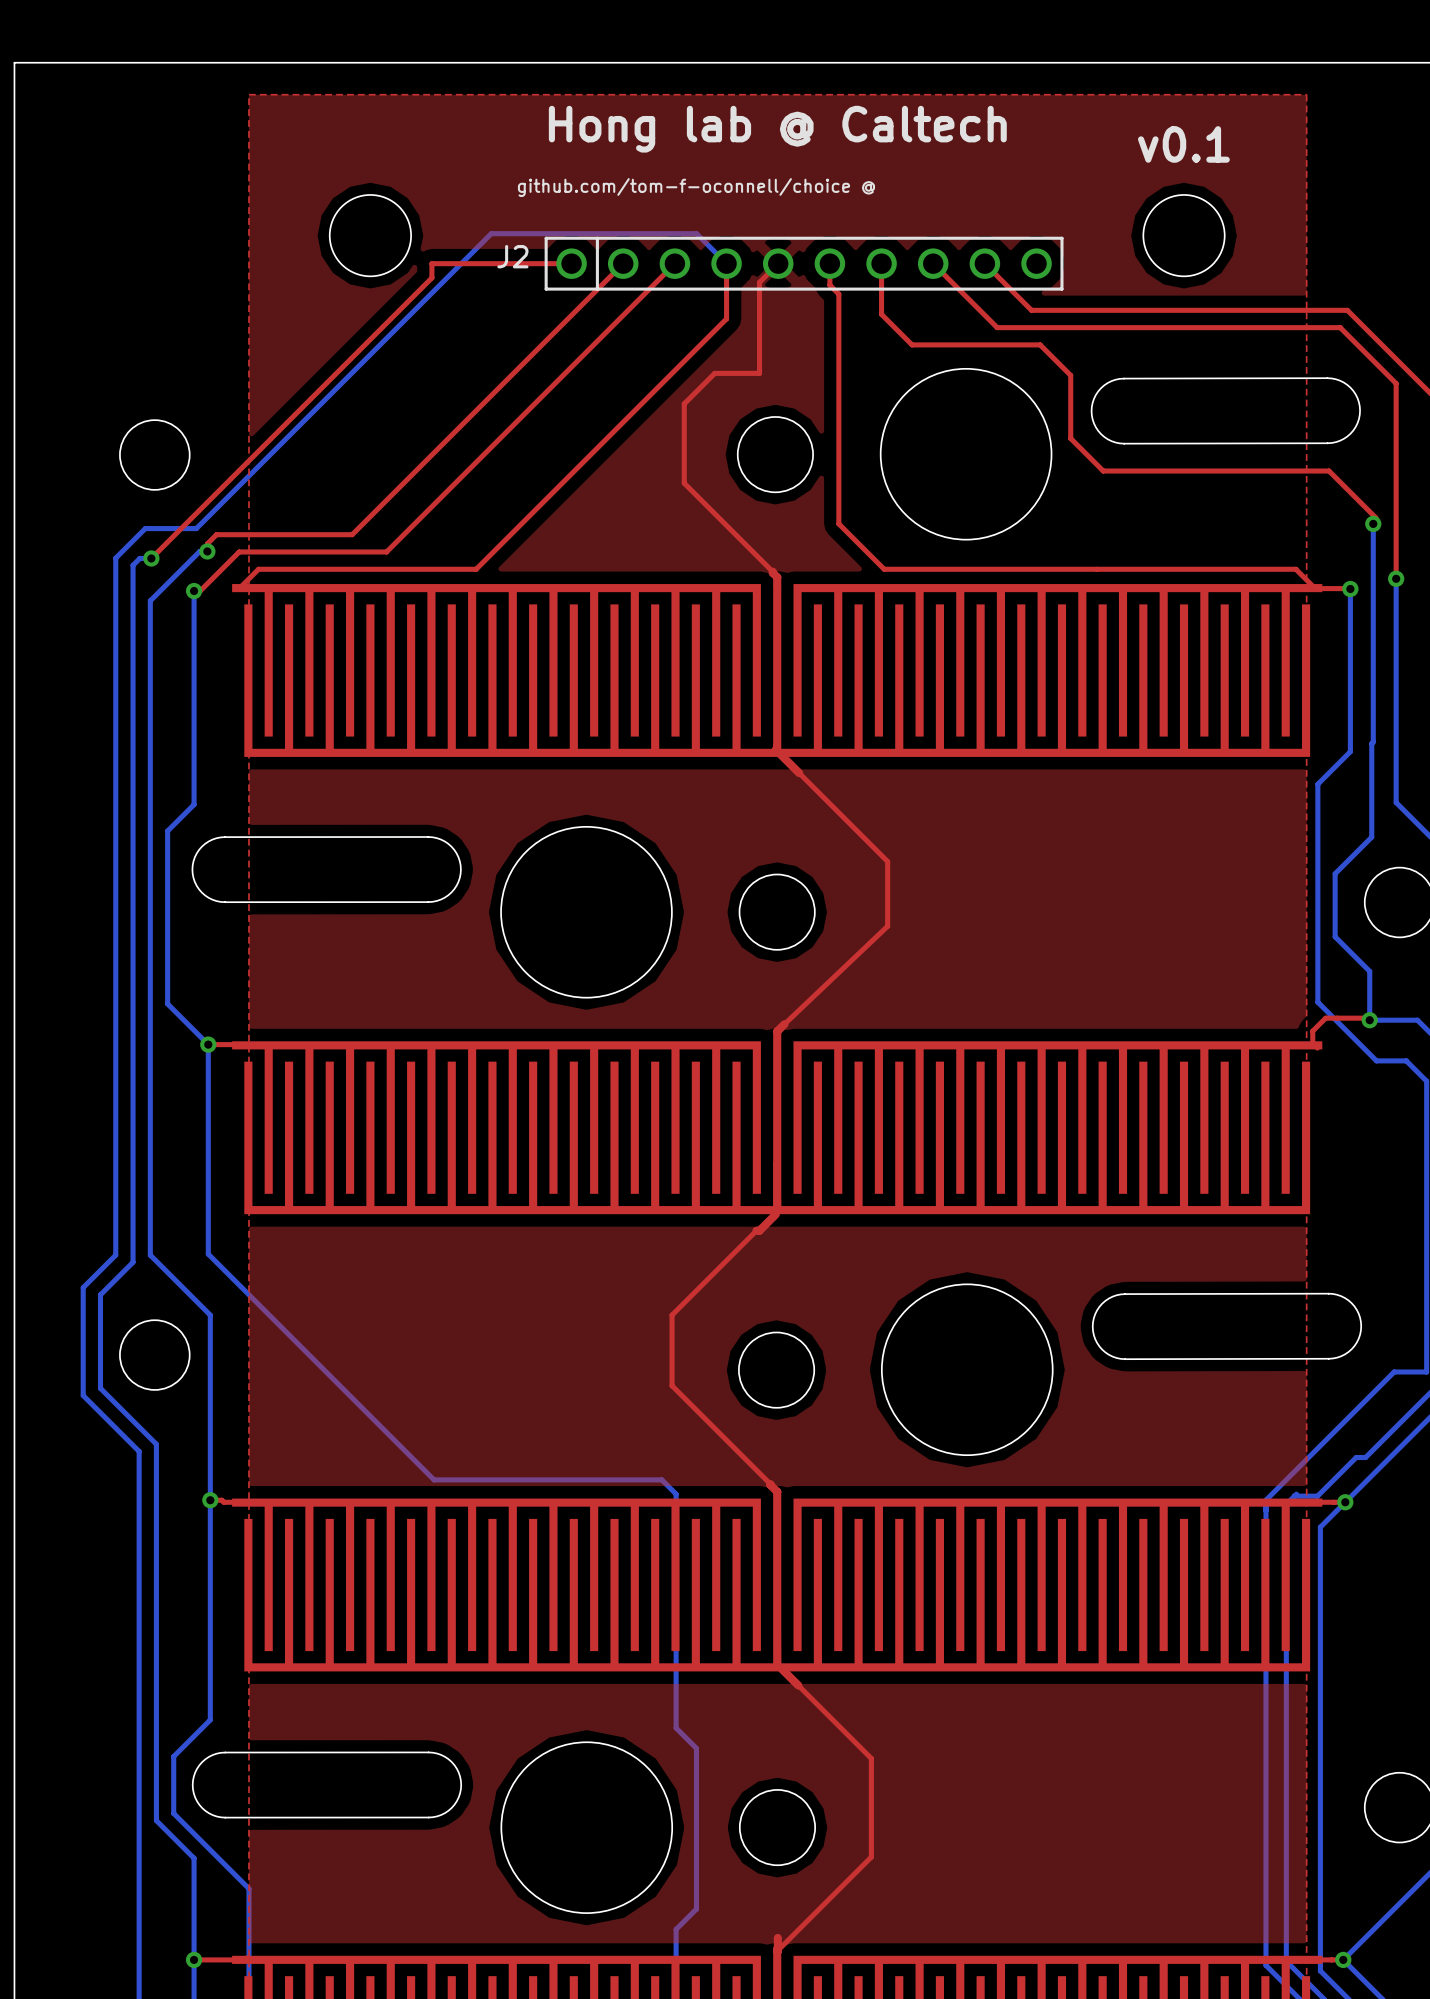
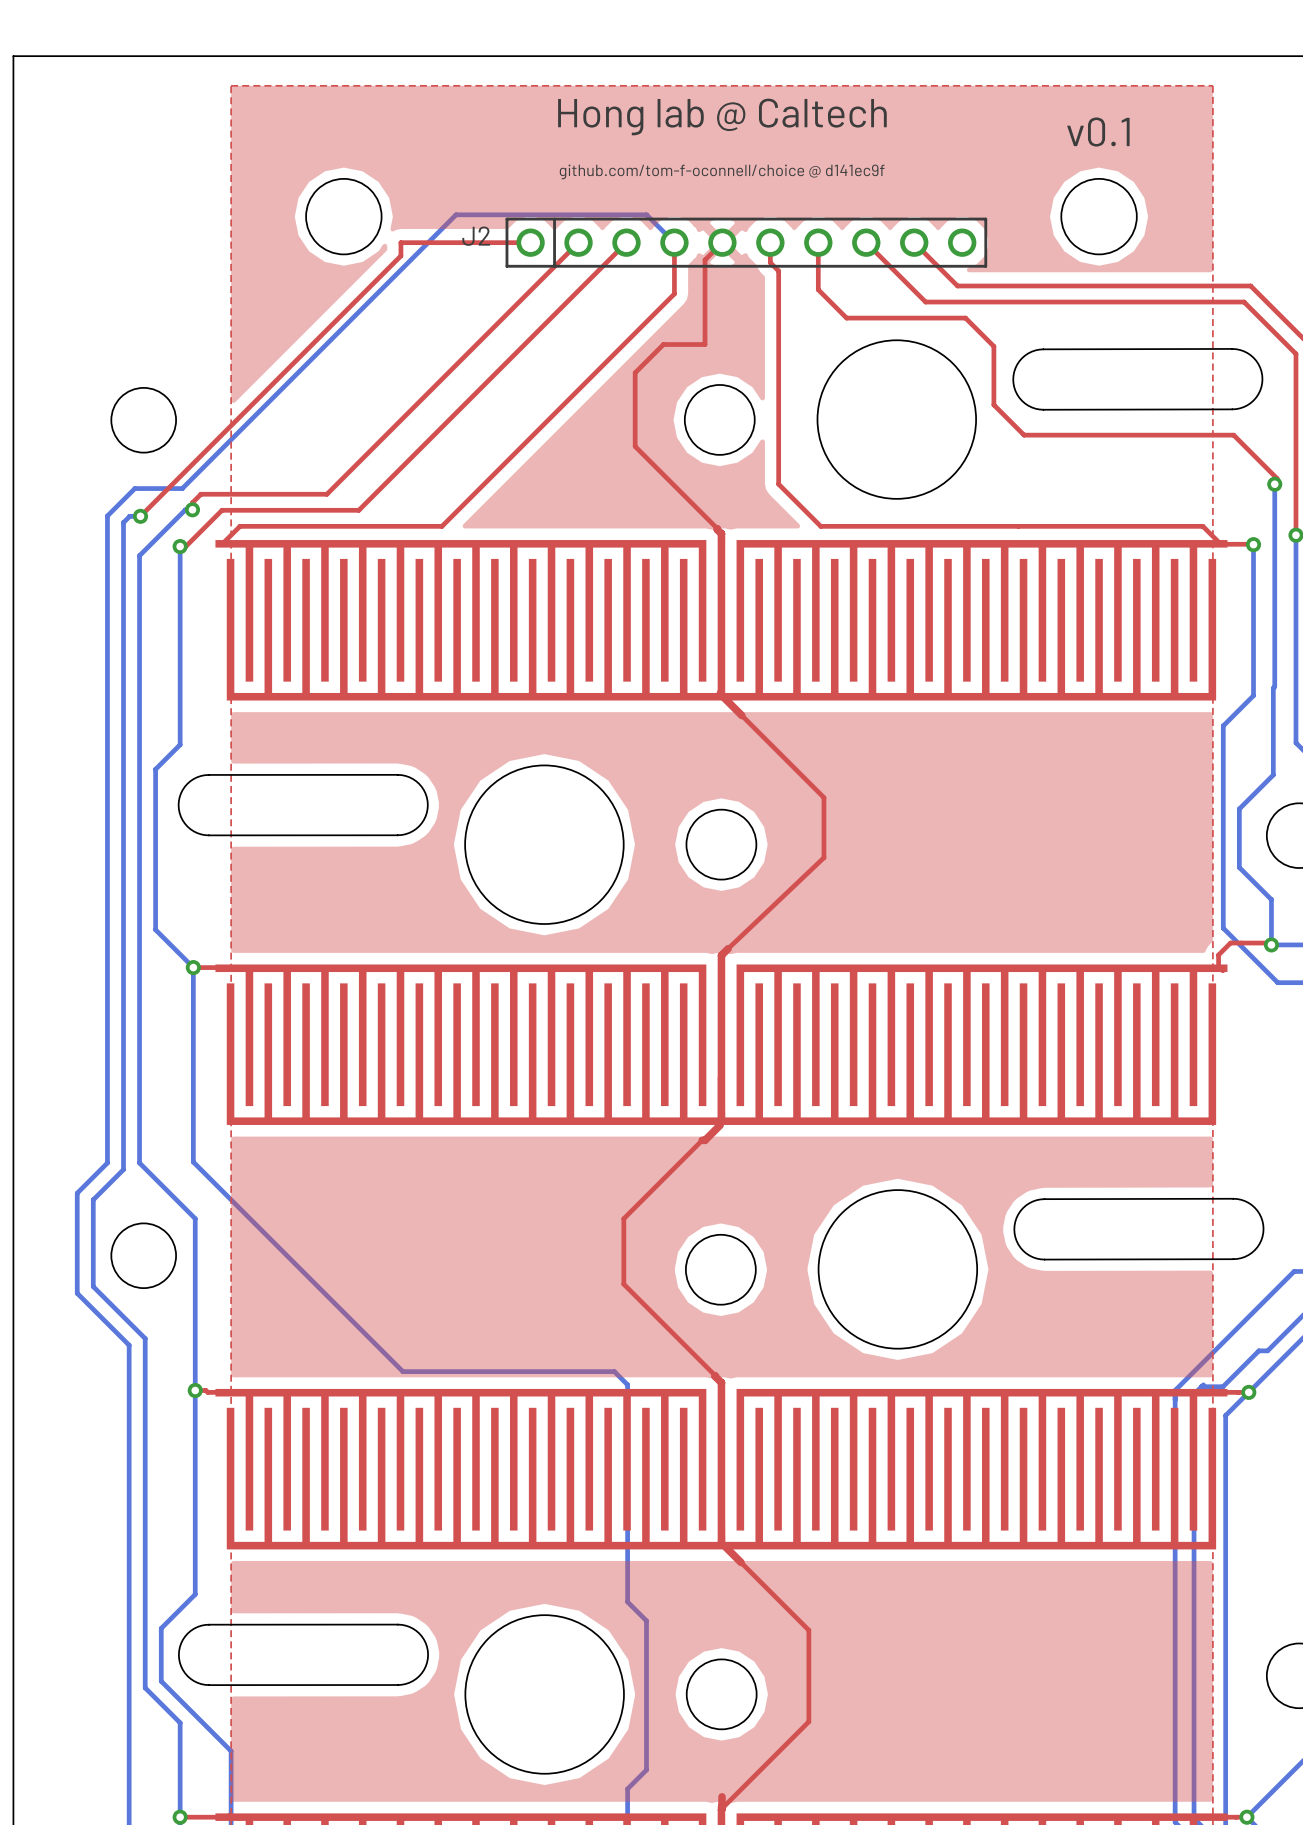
text: github.com/tom-f-oconnell/choice @ (696, 187) -> github.com/tom-f-oconnell/choice @ d141ec9f (722, 171)

